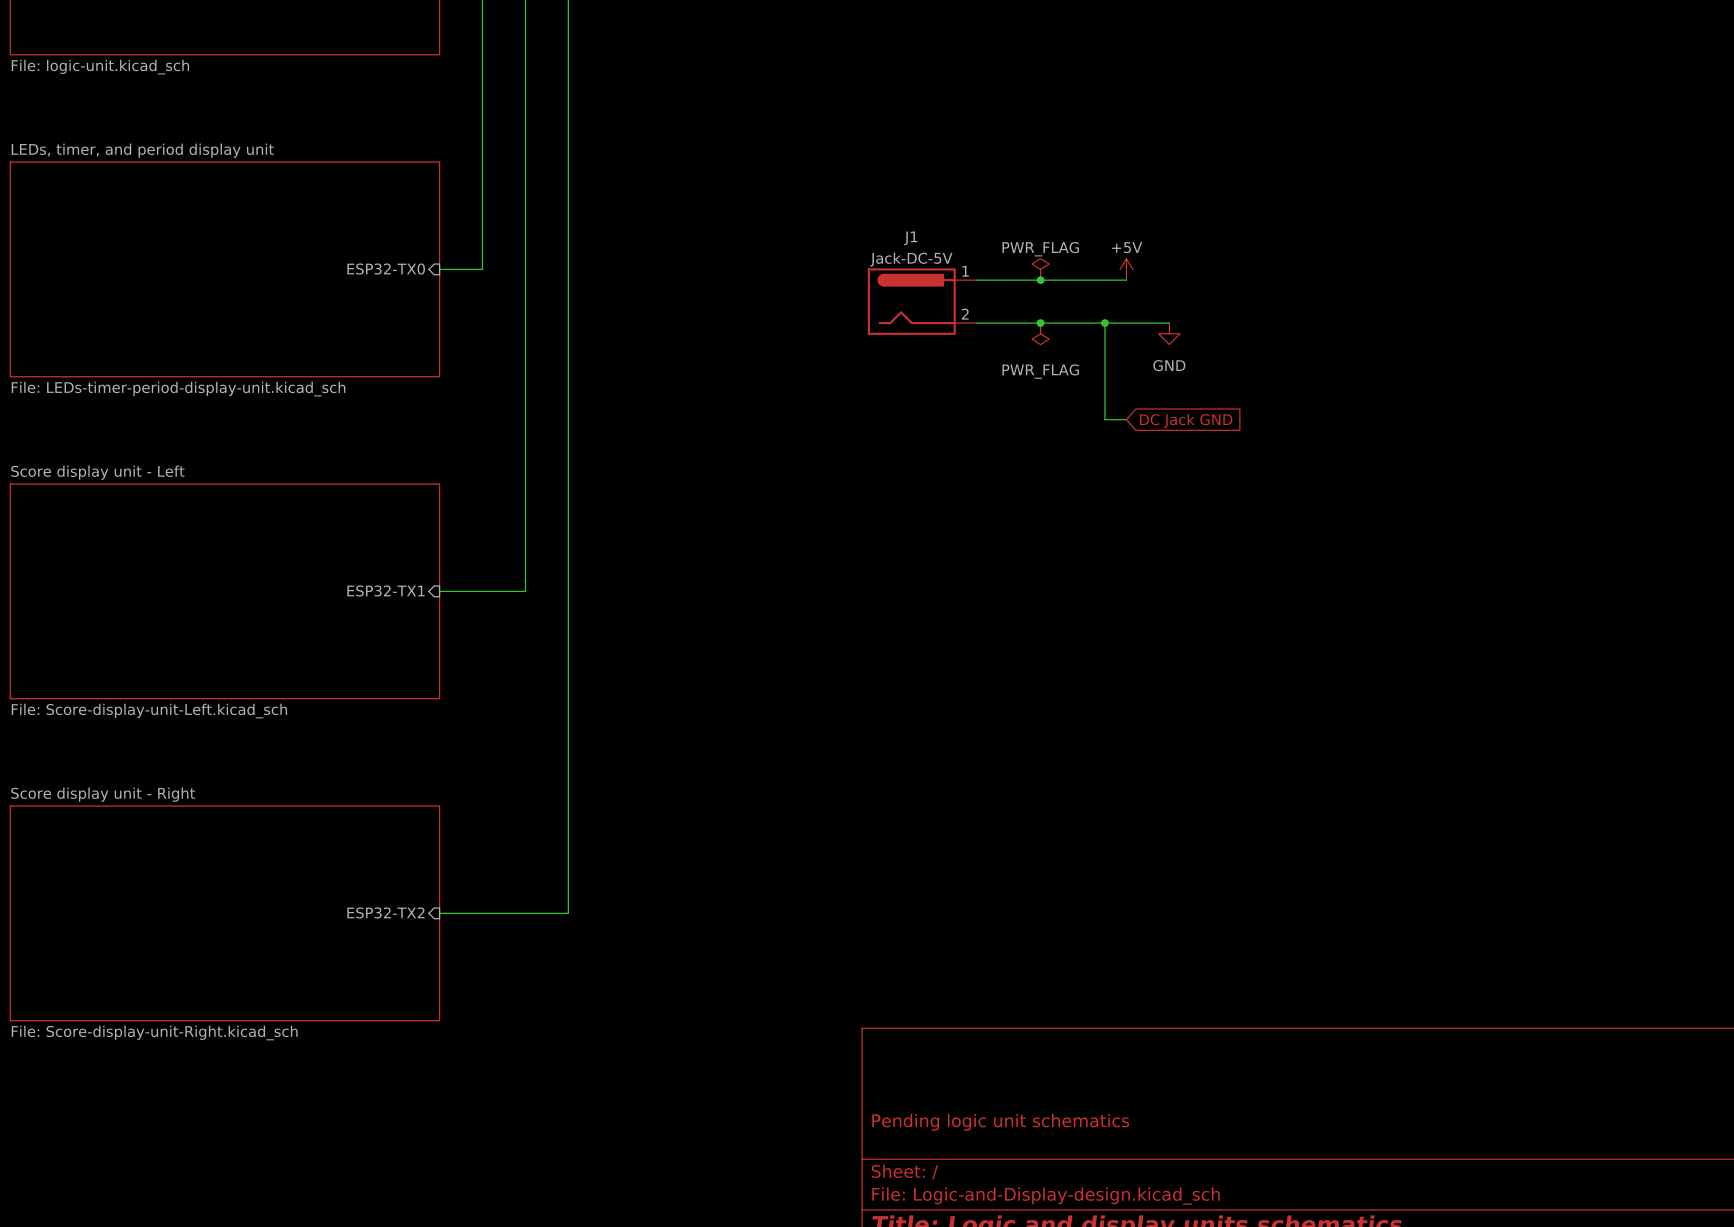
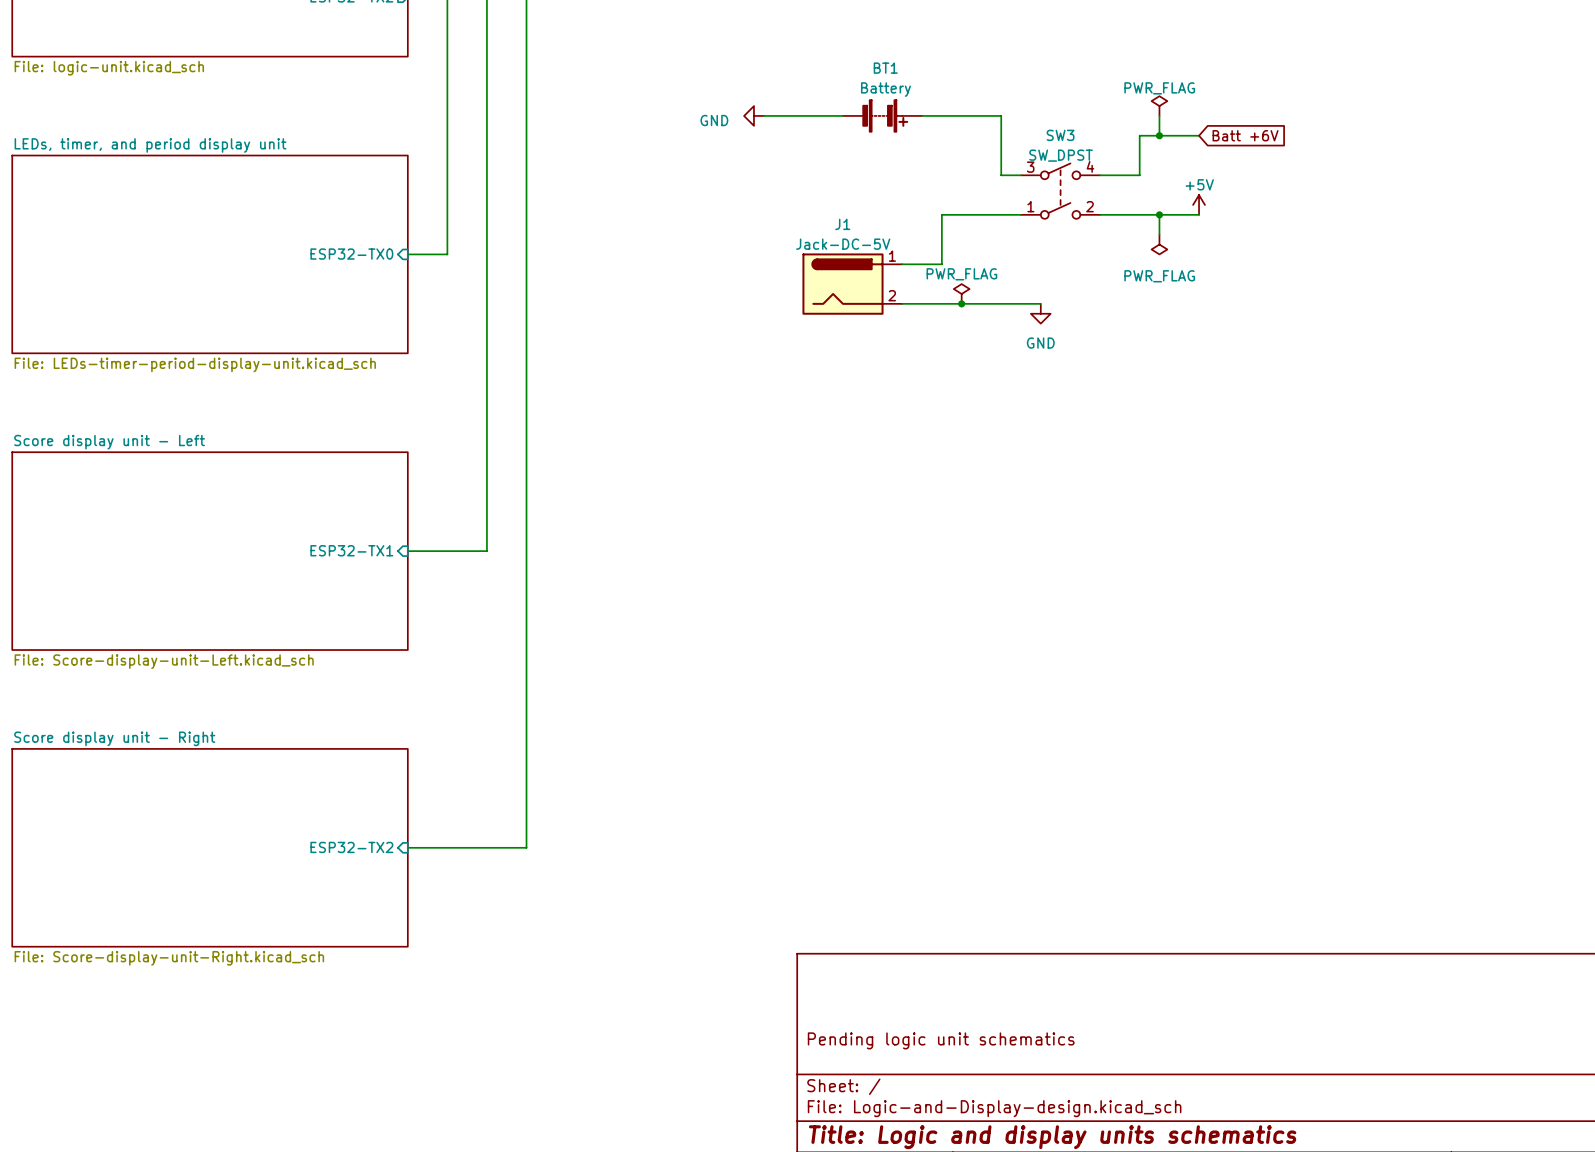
power symbol: none -> PWR_FLAG (1159, 106)
power symbol: none -> GND (753, 115)
wire: none -> (763, 115) (842, 115)
BT1: none -> Battery (882, 115)
wire: none -> (922, 115) (1001, 115) (1001, 175) (1021, 175)
wire: none -> (1159, 115) (1159, 135)
junction: none -> (1159, 135)
wire: none -> (1199, 135) (1139, 135) (1139, 175) (1100, 175)
global label: none -> Batt +6V (1245, 135)
SW3: none -> SW_DPST (1060, 191)
wire: none -> (1100, 214) (1199, 214)
wire: none -> (1159, 214) (1159, 234)
junction: none -> (1159, 214)
power symbol: none -> PWR_FLAG (1159, 244)
power symbol: PWR_FLAG (1040, 269) -> none
power symbol position: +5V (1126, 269) -> +5V (1199, 204)
wire: (1019, 280) (1126, 280) -> (941, 264) (941, 214) (1021, 214)
junction: (1040, 280) -> none
power symbol: none -> PWR_FLAG (961, 293)
wire: (1104, 323) (1104, 419) (1126, 419) -> none
junction: (1104, 323) -> none
wire: (1126, 323) (1169, 323) -> none
power symbol: PWR_FLAG (1040, 333) -> none
power symbol position: GND (1169, 333) -> GND (1040, 313)
global label: DC Jack GND (1186, 420) -> none

